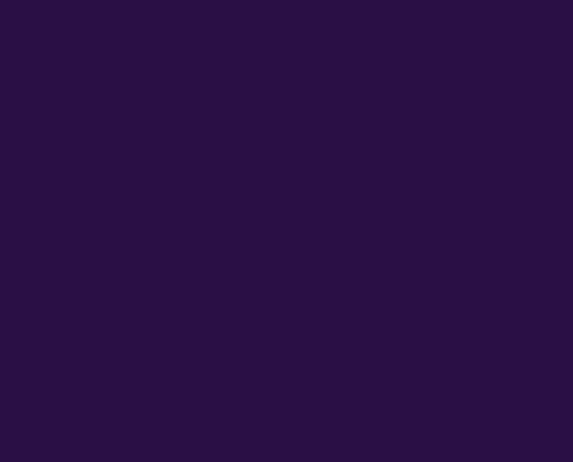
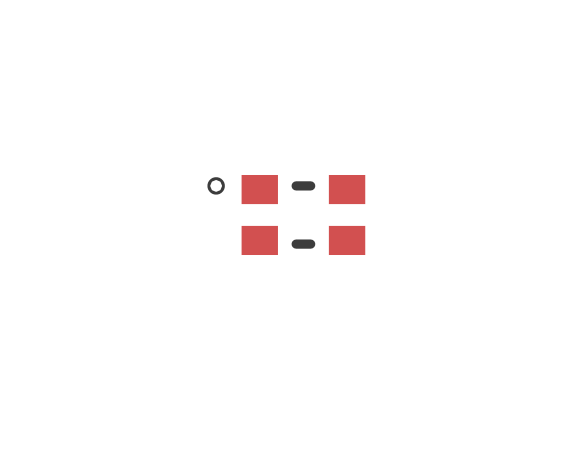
part: none -> (286, 215)

